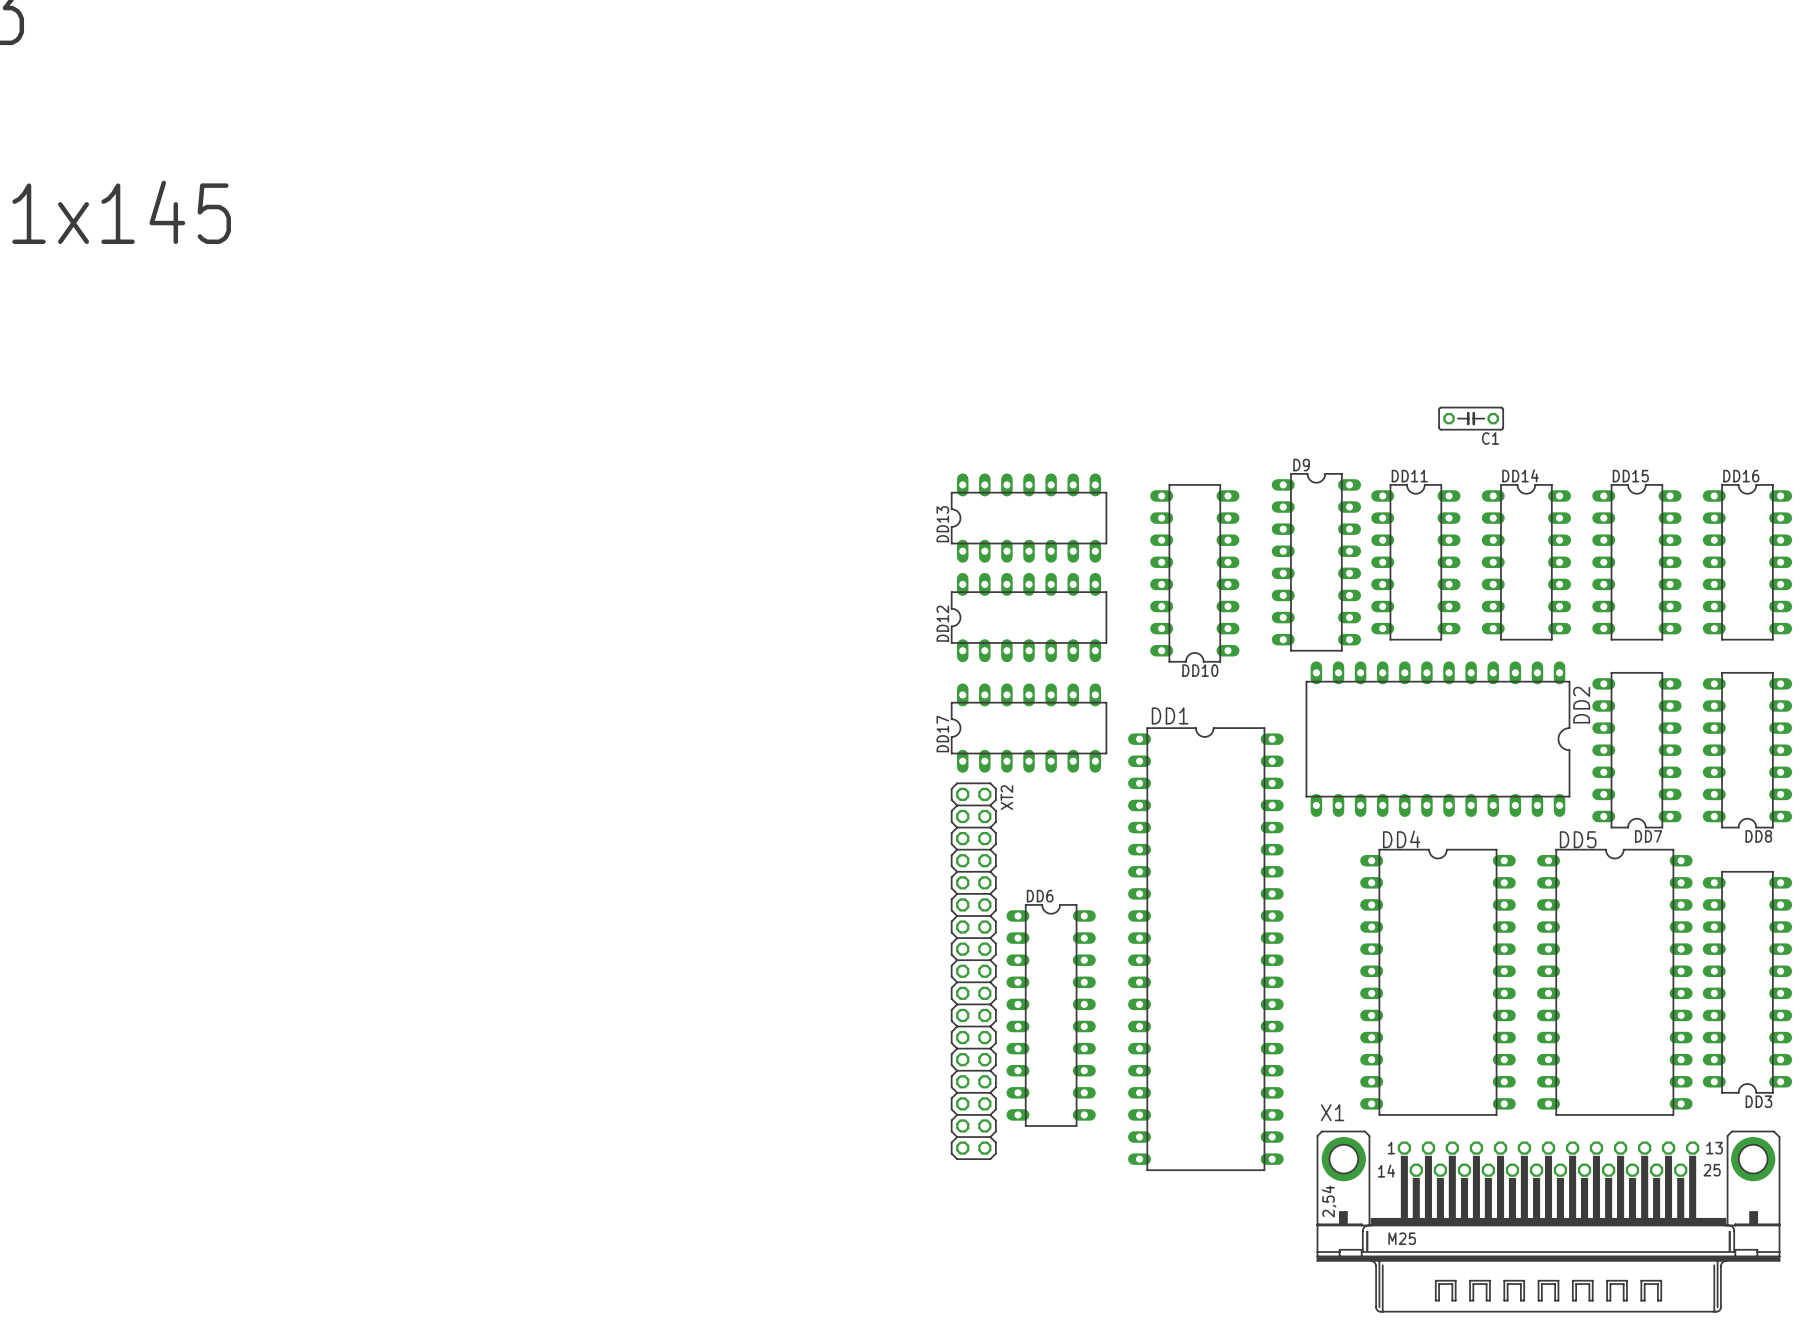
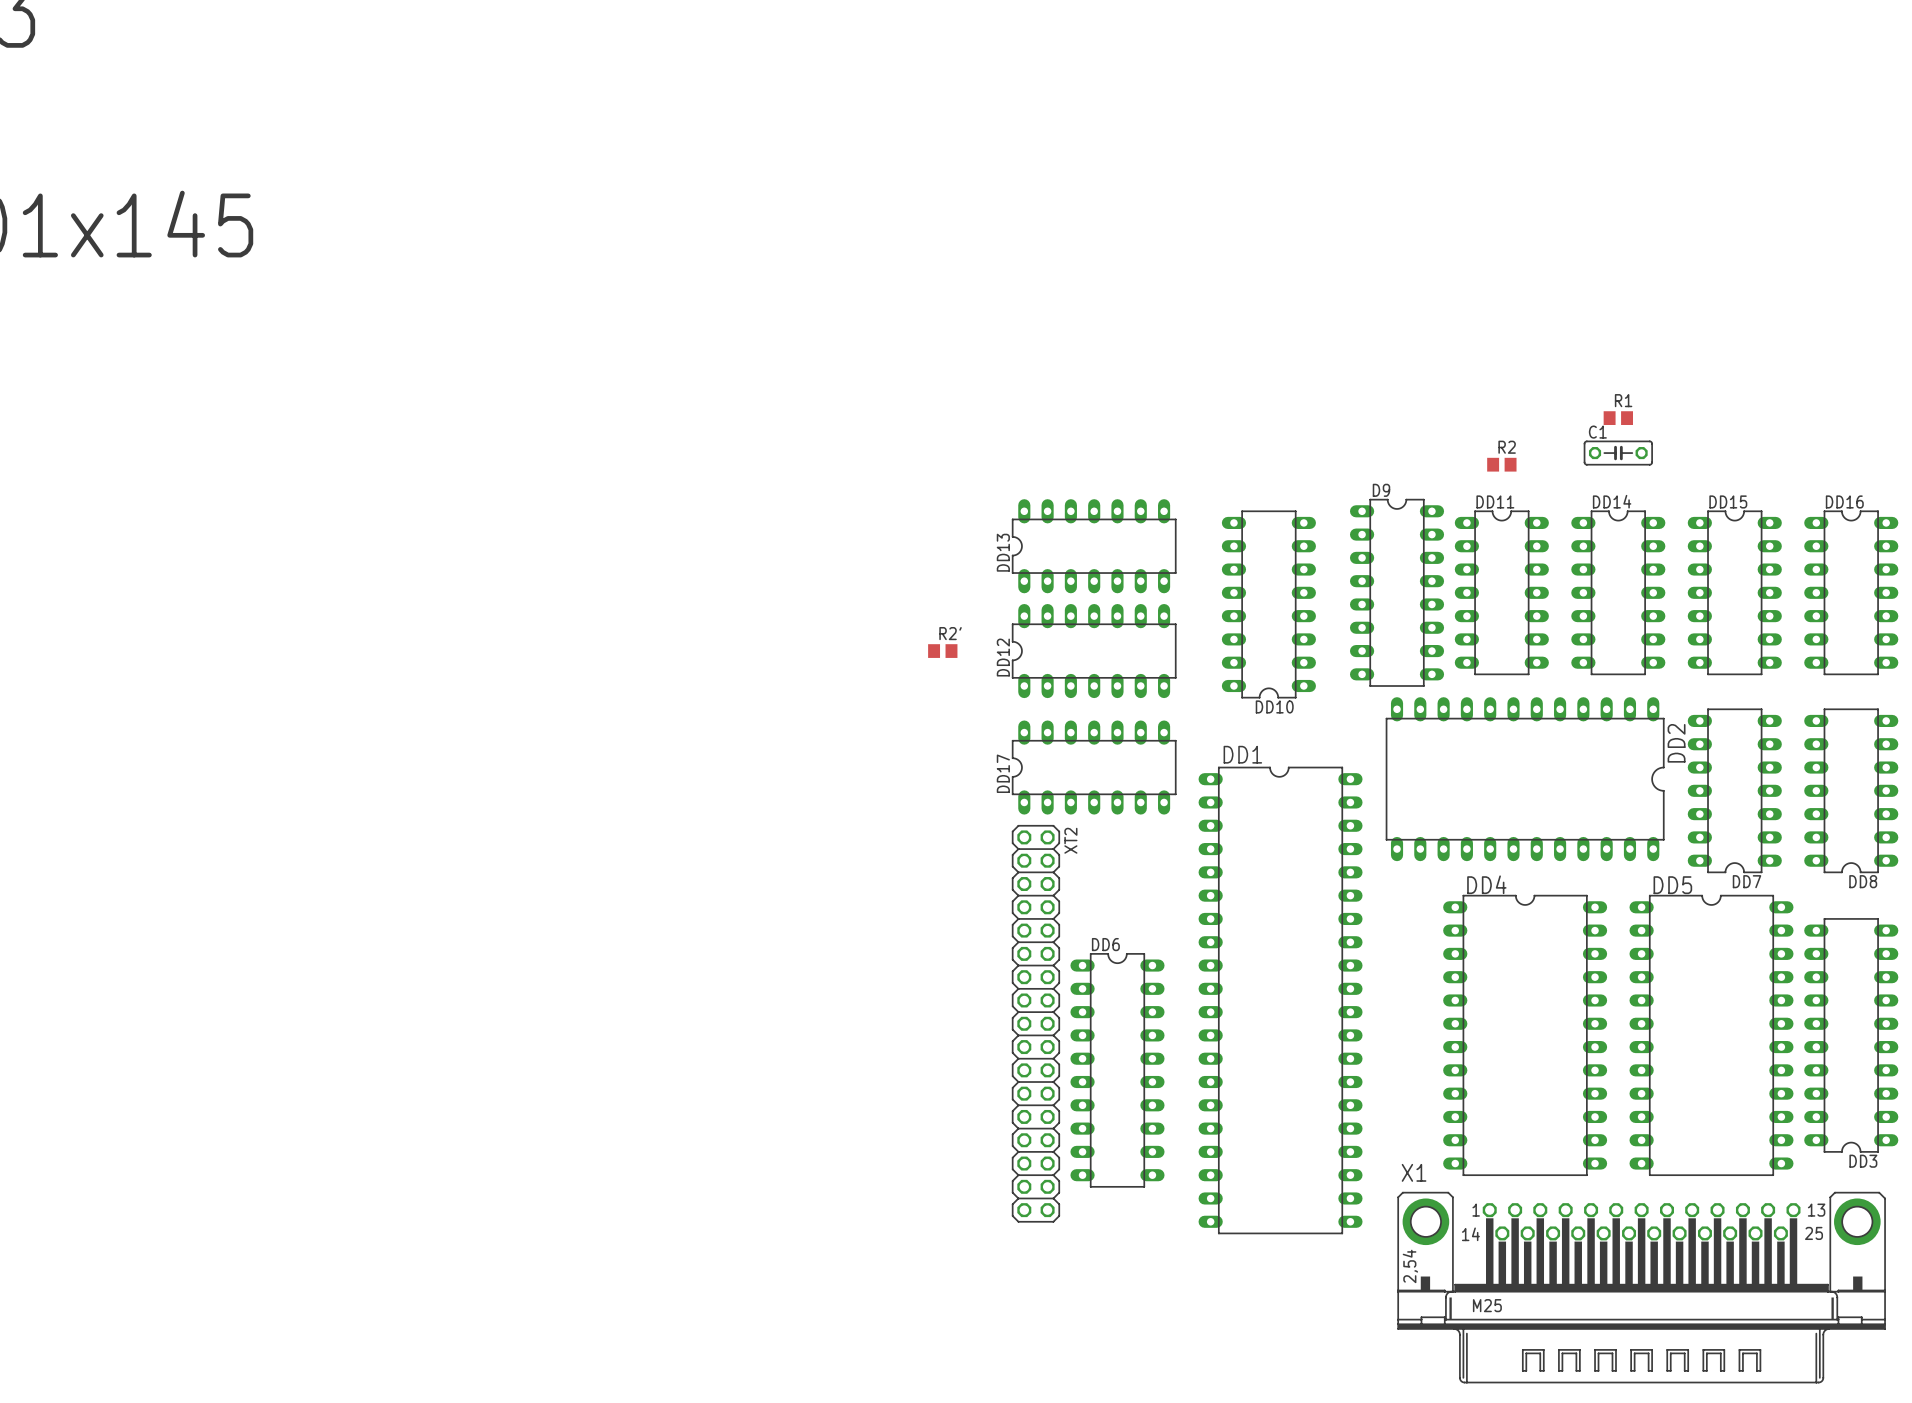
R1: none -> (1618, 418)
C1 rotation: 0° (1471, 418) -> 180° (1618, 453)
C1 position: (1471, 418) -> (1618, 453)
R2: none -> (1501, 464)
R2': none -> (942, 651)

